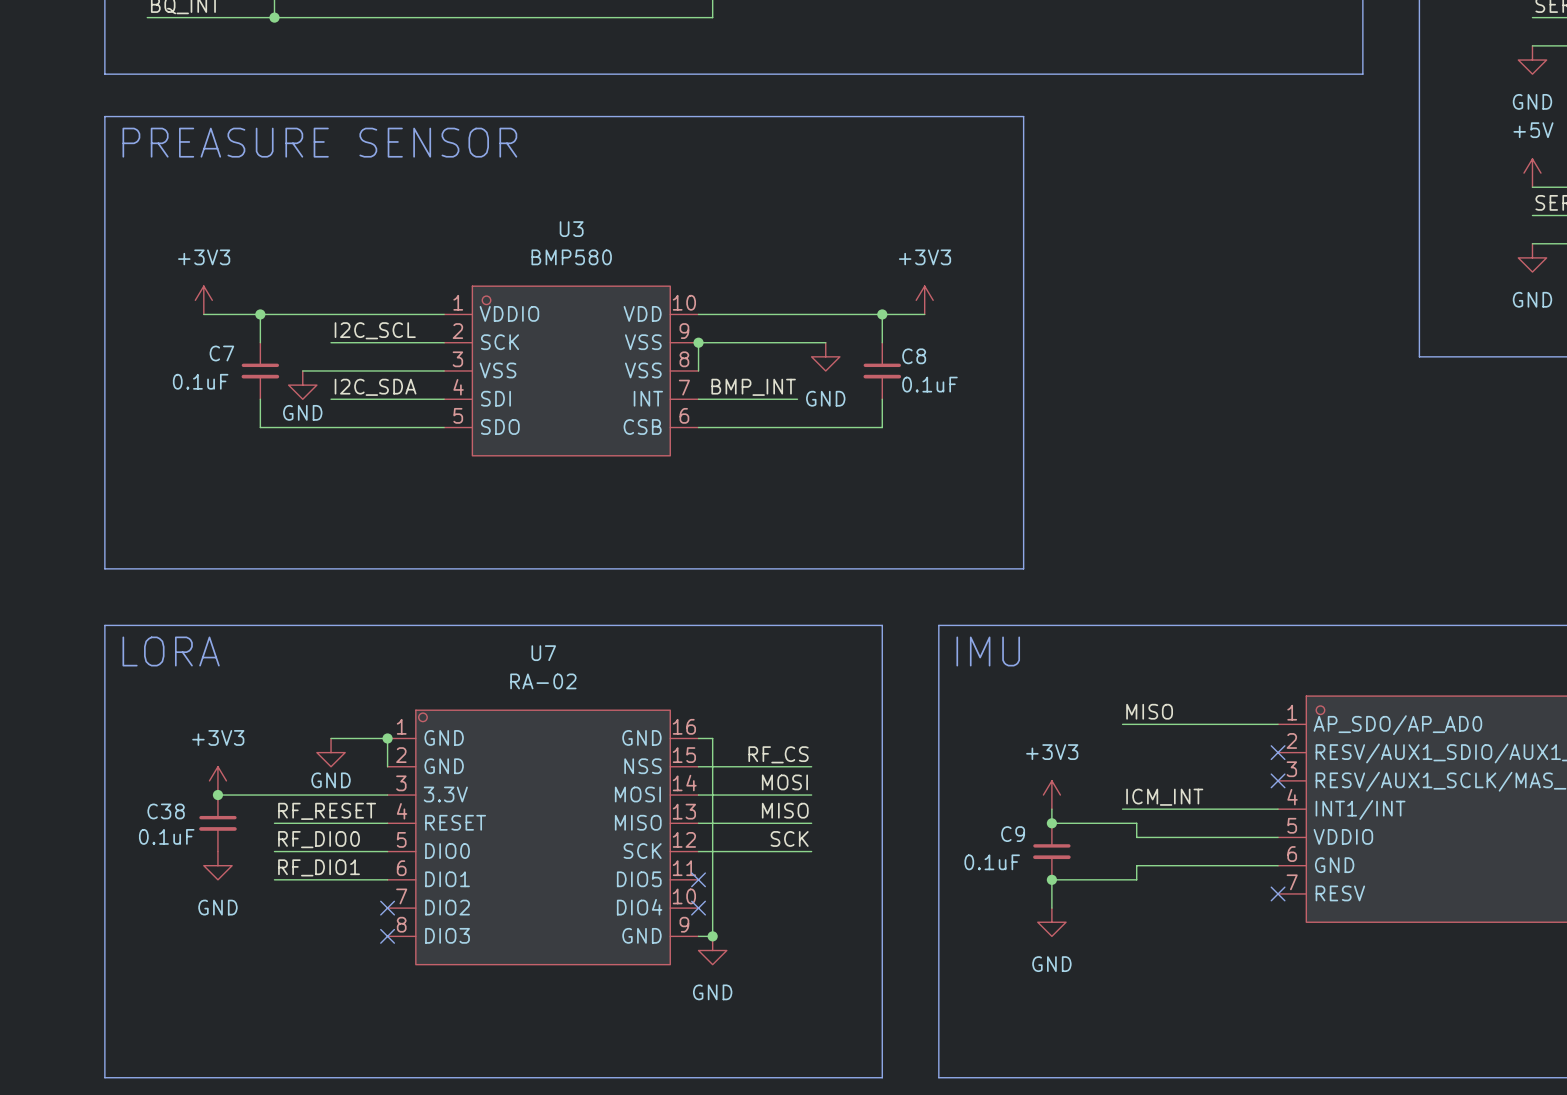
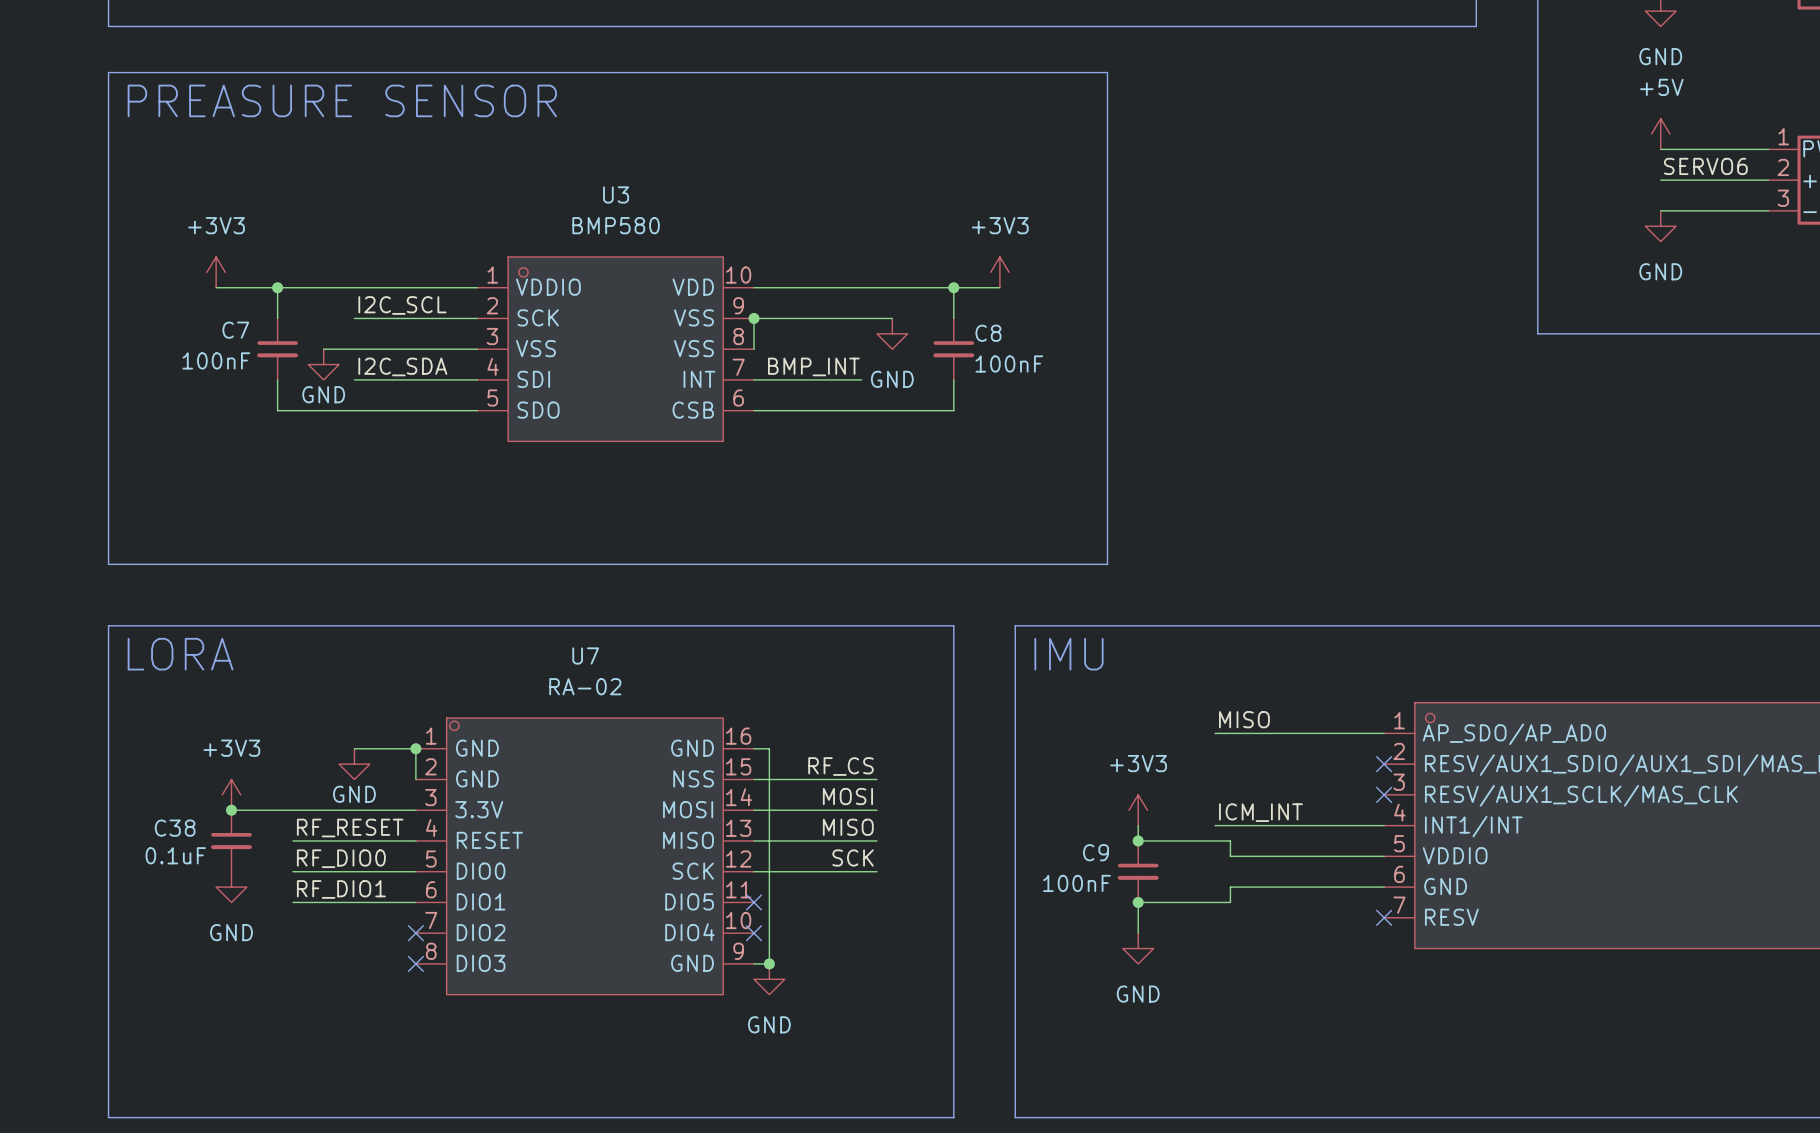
C7 value: 0.1uF (200, 381) -> 100nF (216, 360)
C8 value: 0.1uF (929, 384) -> 100nF (1009, 363)
C9 value: 0.1uF (992, 862) -> 100nF (1076, 883)

